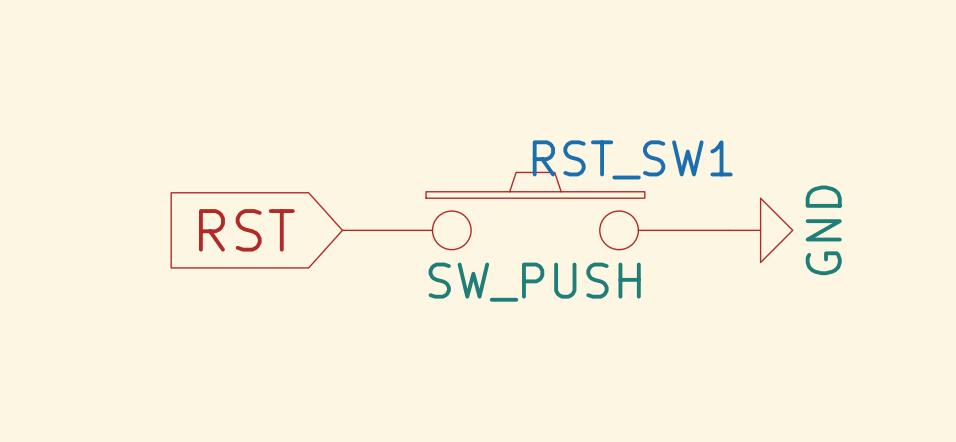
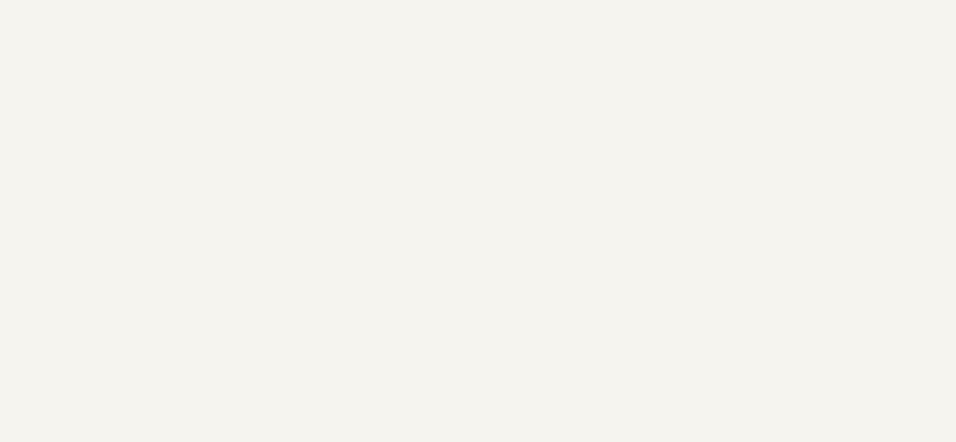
RST_SW1: SW_PUSH (535, 211) -> none
global label: RST (246, 230) -> none
power symbol: GND (760, 230) -> none

